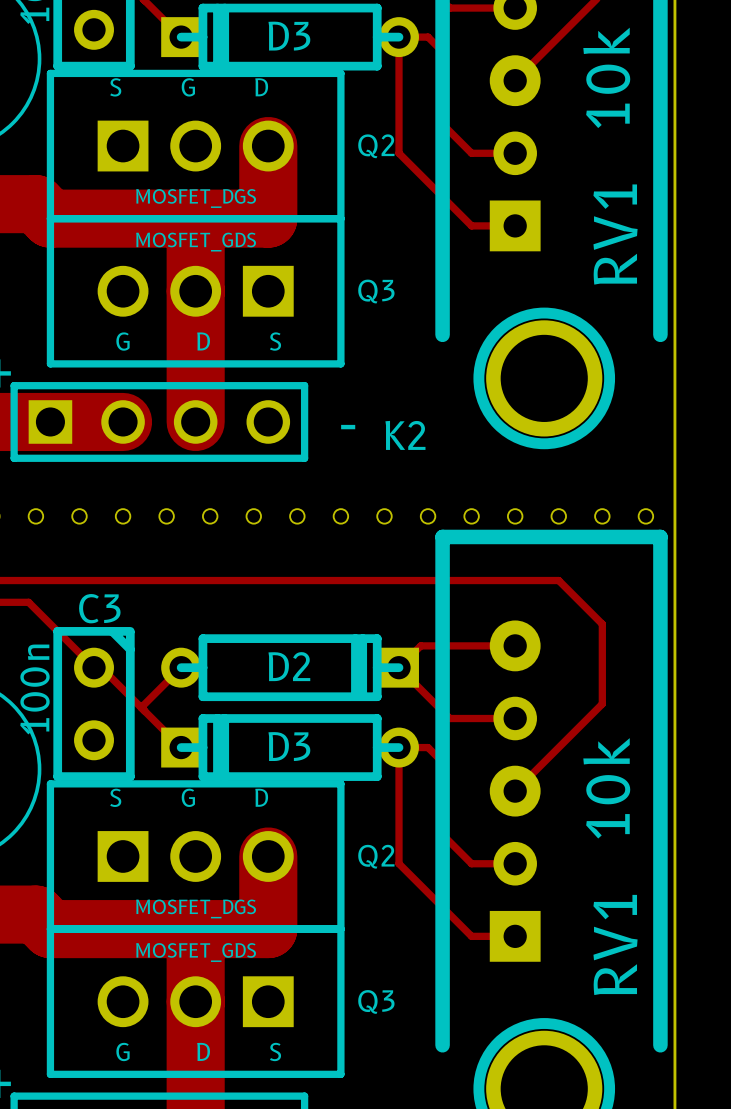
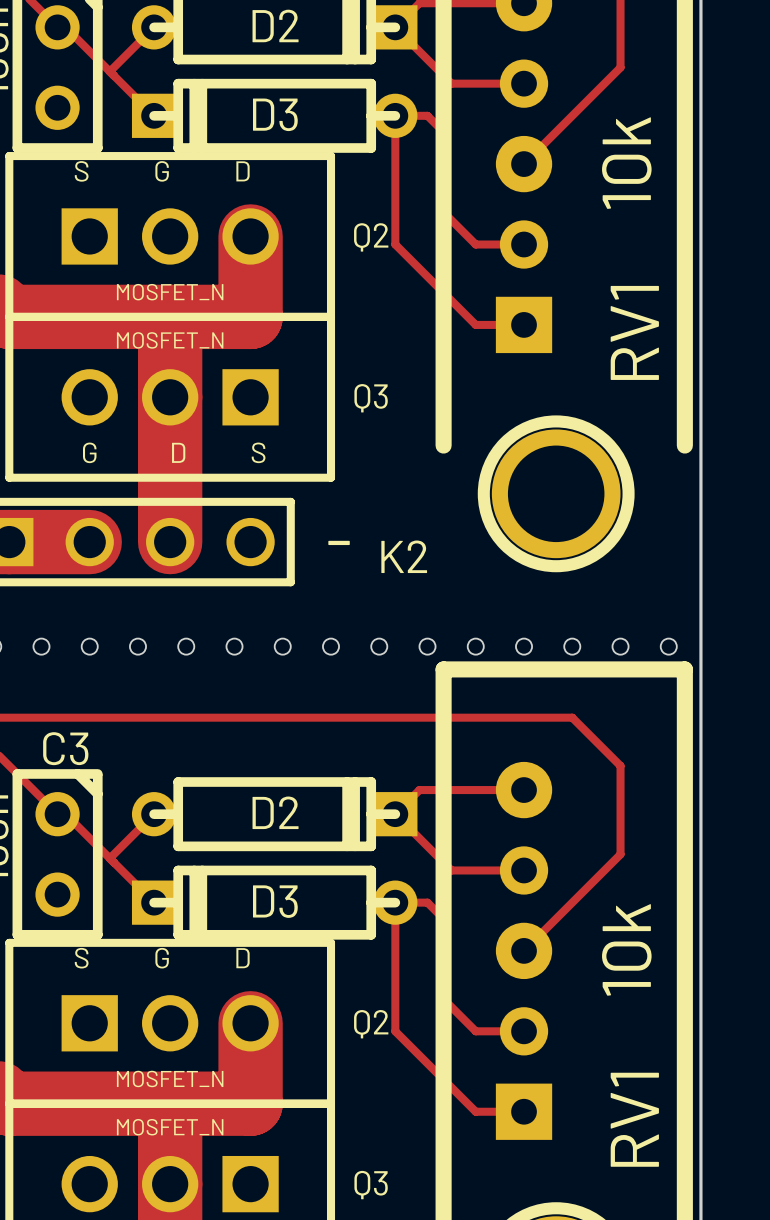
Q2 value: MOSFET_DGS (196, 198) -> MOSFET_N (170, 292)
Q3 value: MOSFET_GDS (196, 242) -> MOSFET_N (170, 340)
Q2 value: MOSFET_DGS (196, 908) -> MOSFET_N (170, 1078)
Q3 value: MOSFET_GDS (196, 952) -> MOSFET_N (170, 1127)

